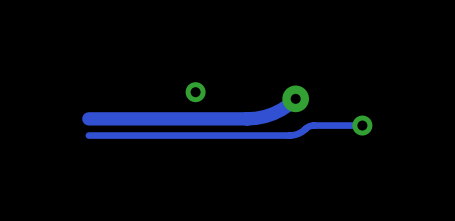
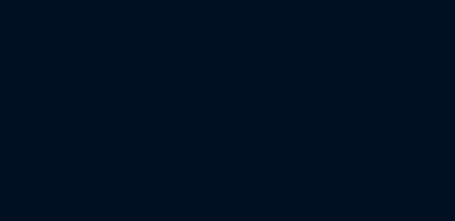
via: (195, 92) -> none
track: (295, 98) (273, 113) (256, 118) (88, 118) -> none
via: (295, 98) -> none
track: (362, 125) (312, 125) (298, 133) (289, 135) (88, 135) -> none
via: (362, 125) -> none

